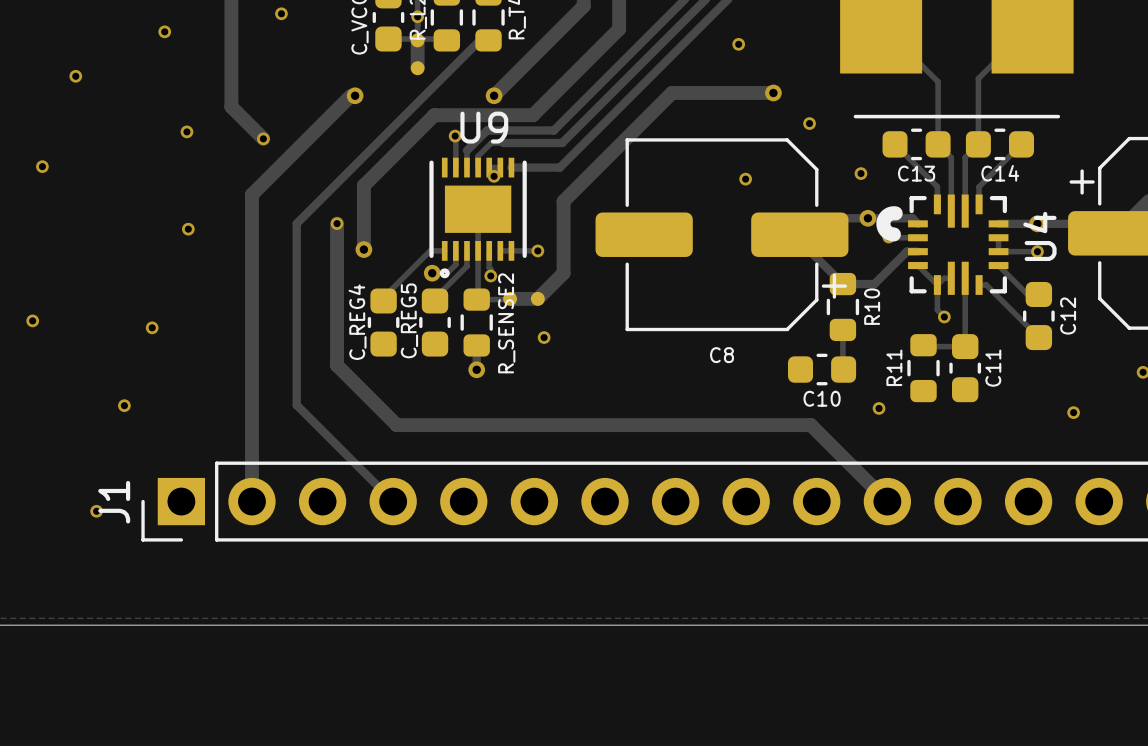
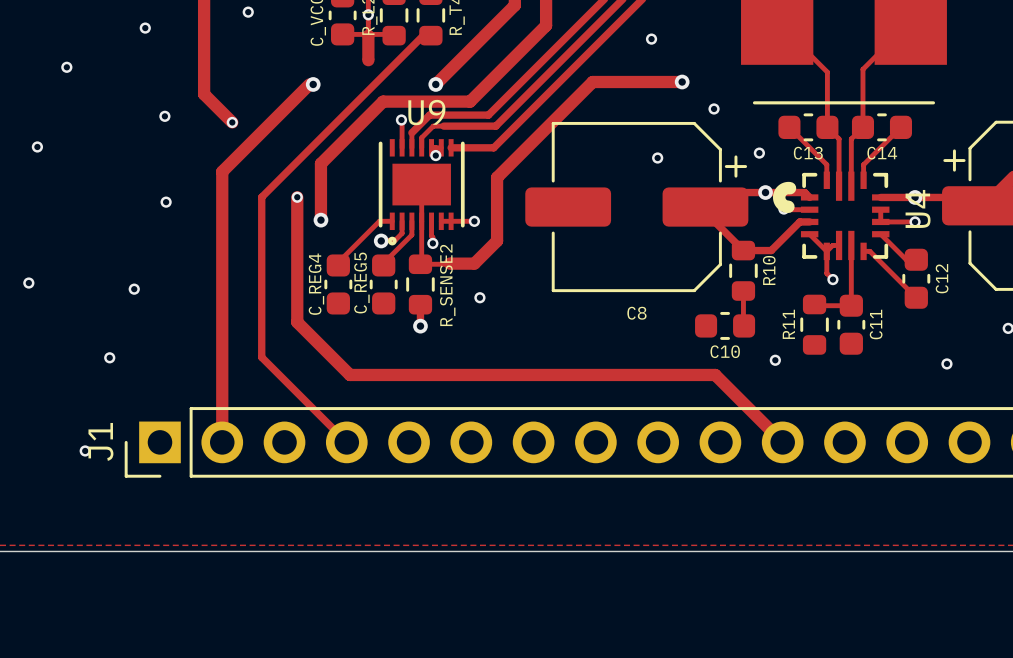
C8 footprint: [595, 138, 849, 332] -> [525, 121, 749, 293]

